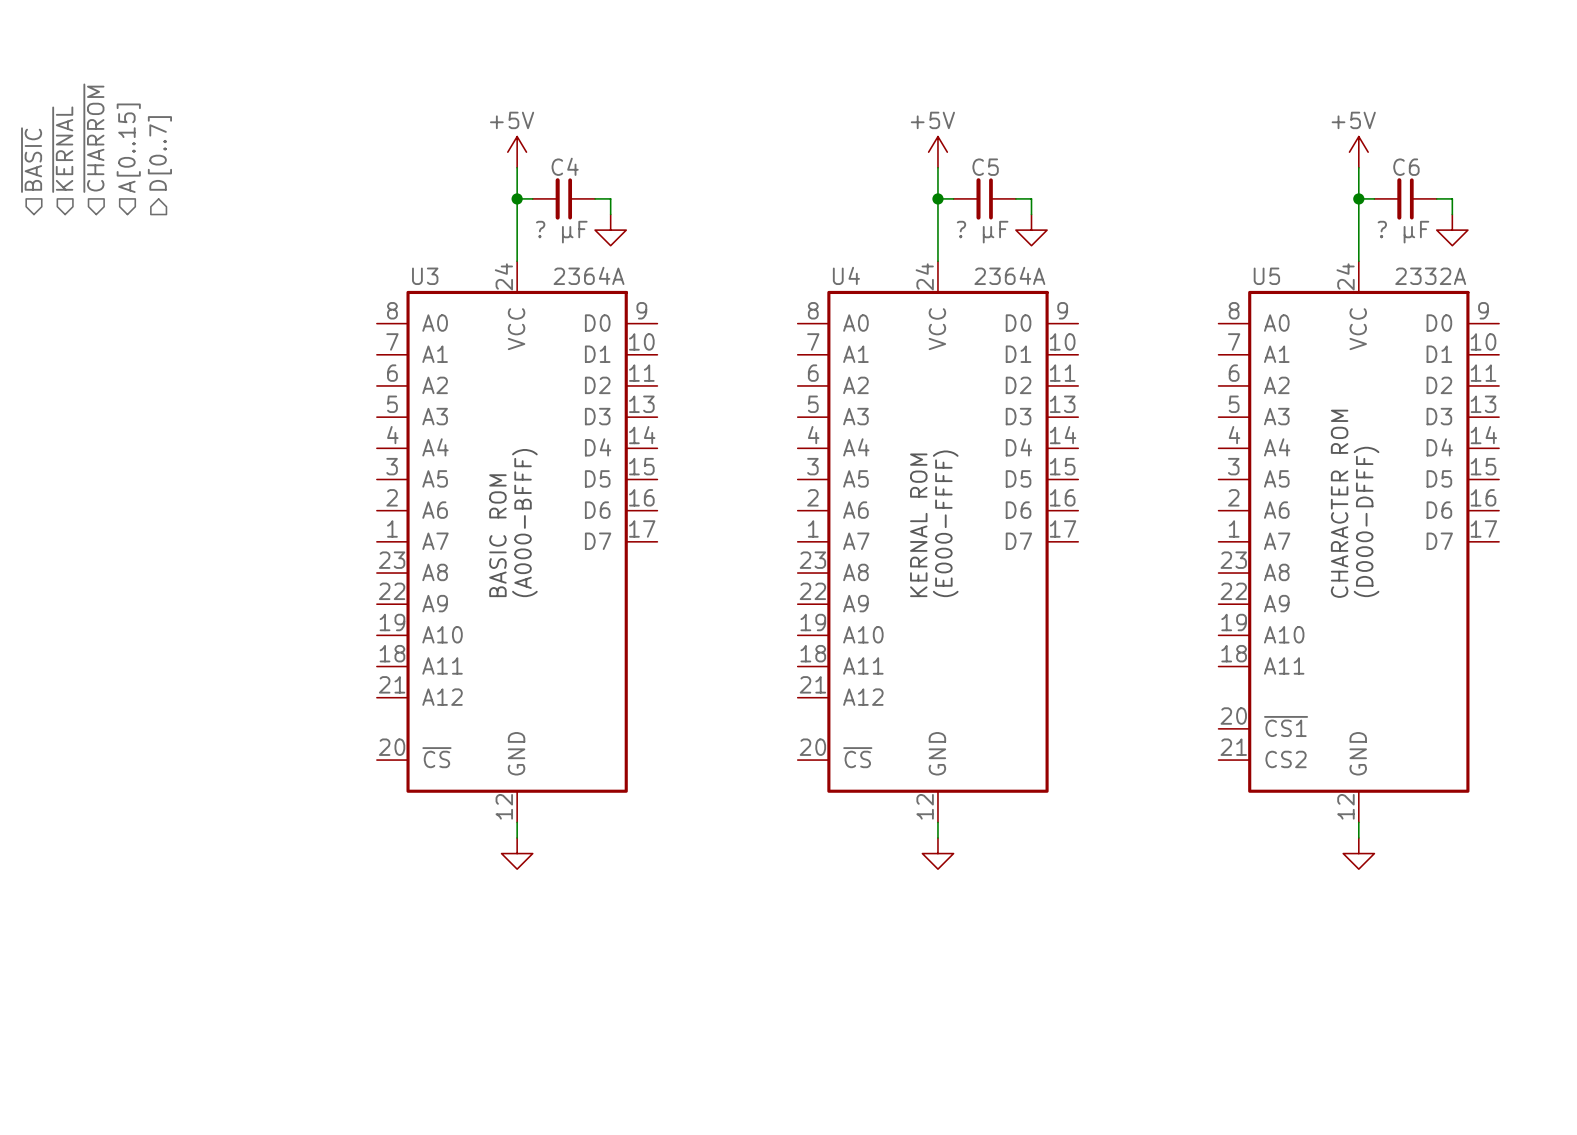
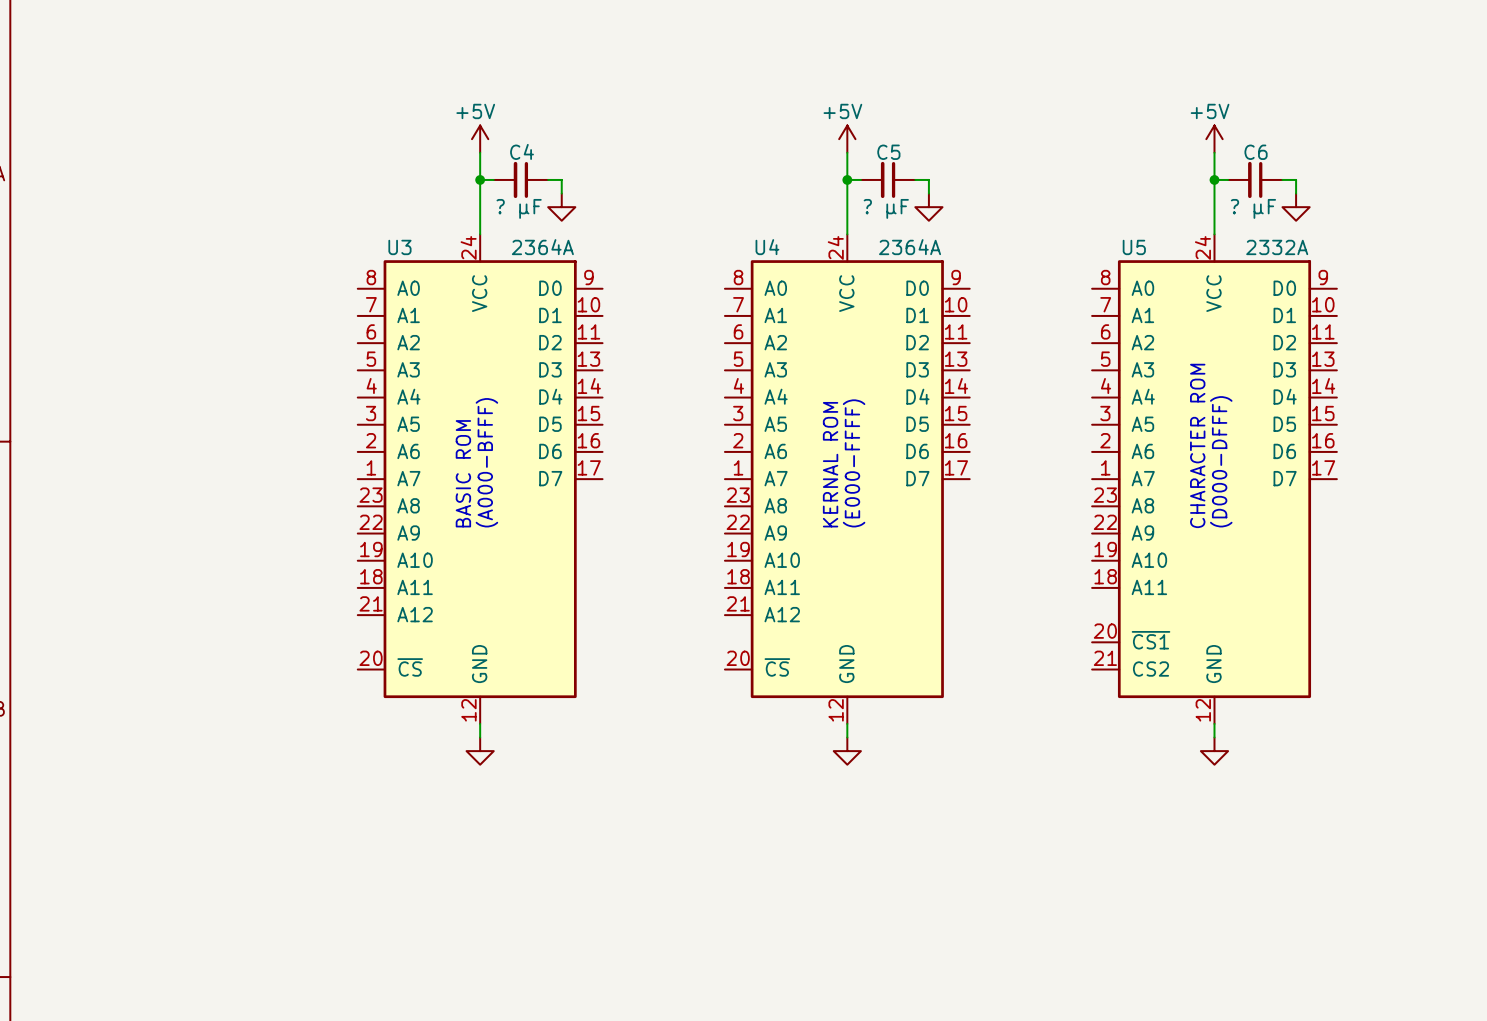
hierarchical label: ~{CHARROM} (93, 138) -> none
hierarchical label: A[0..15] (128, 148) -> none
hierarchical label: ~{KERNAL} (62, 149) -> none
hierarchical label: D[0..7] (159, 153) -> none
hierarchical label: ~{BASIC} (31, 160) -> none

